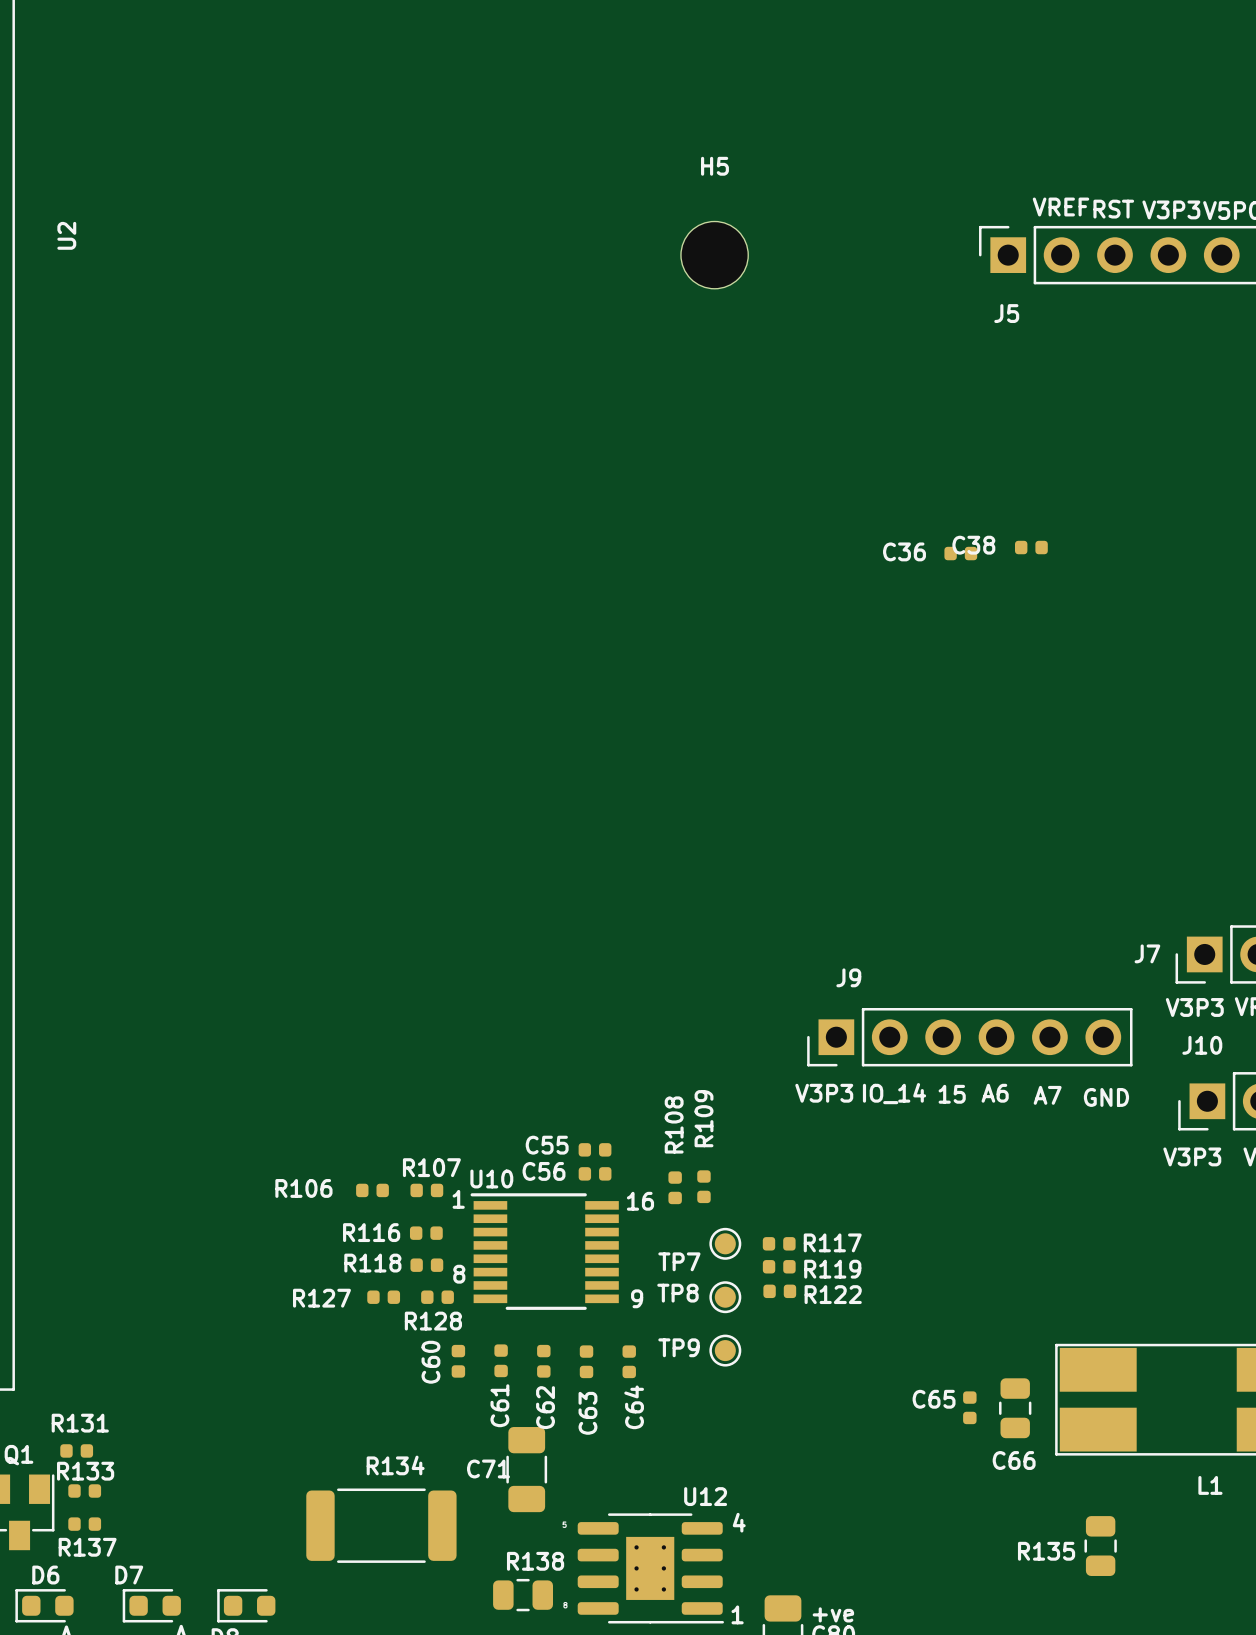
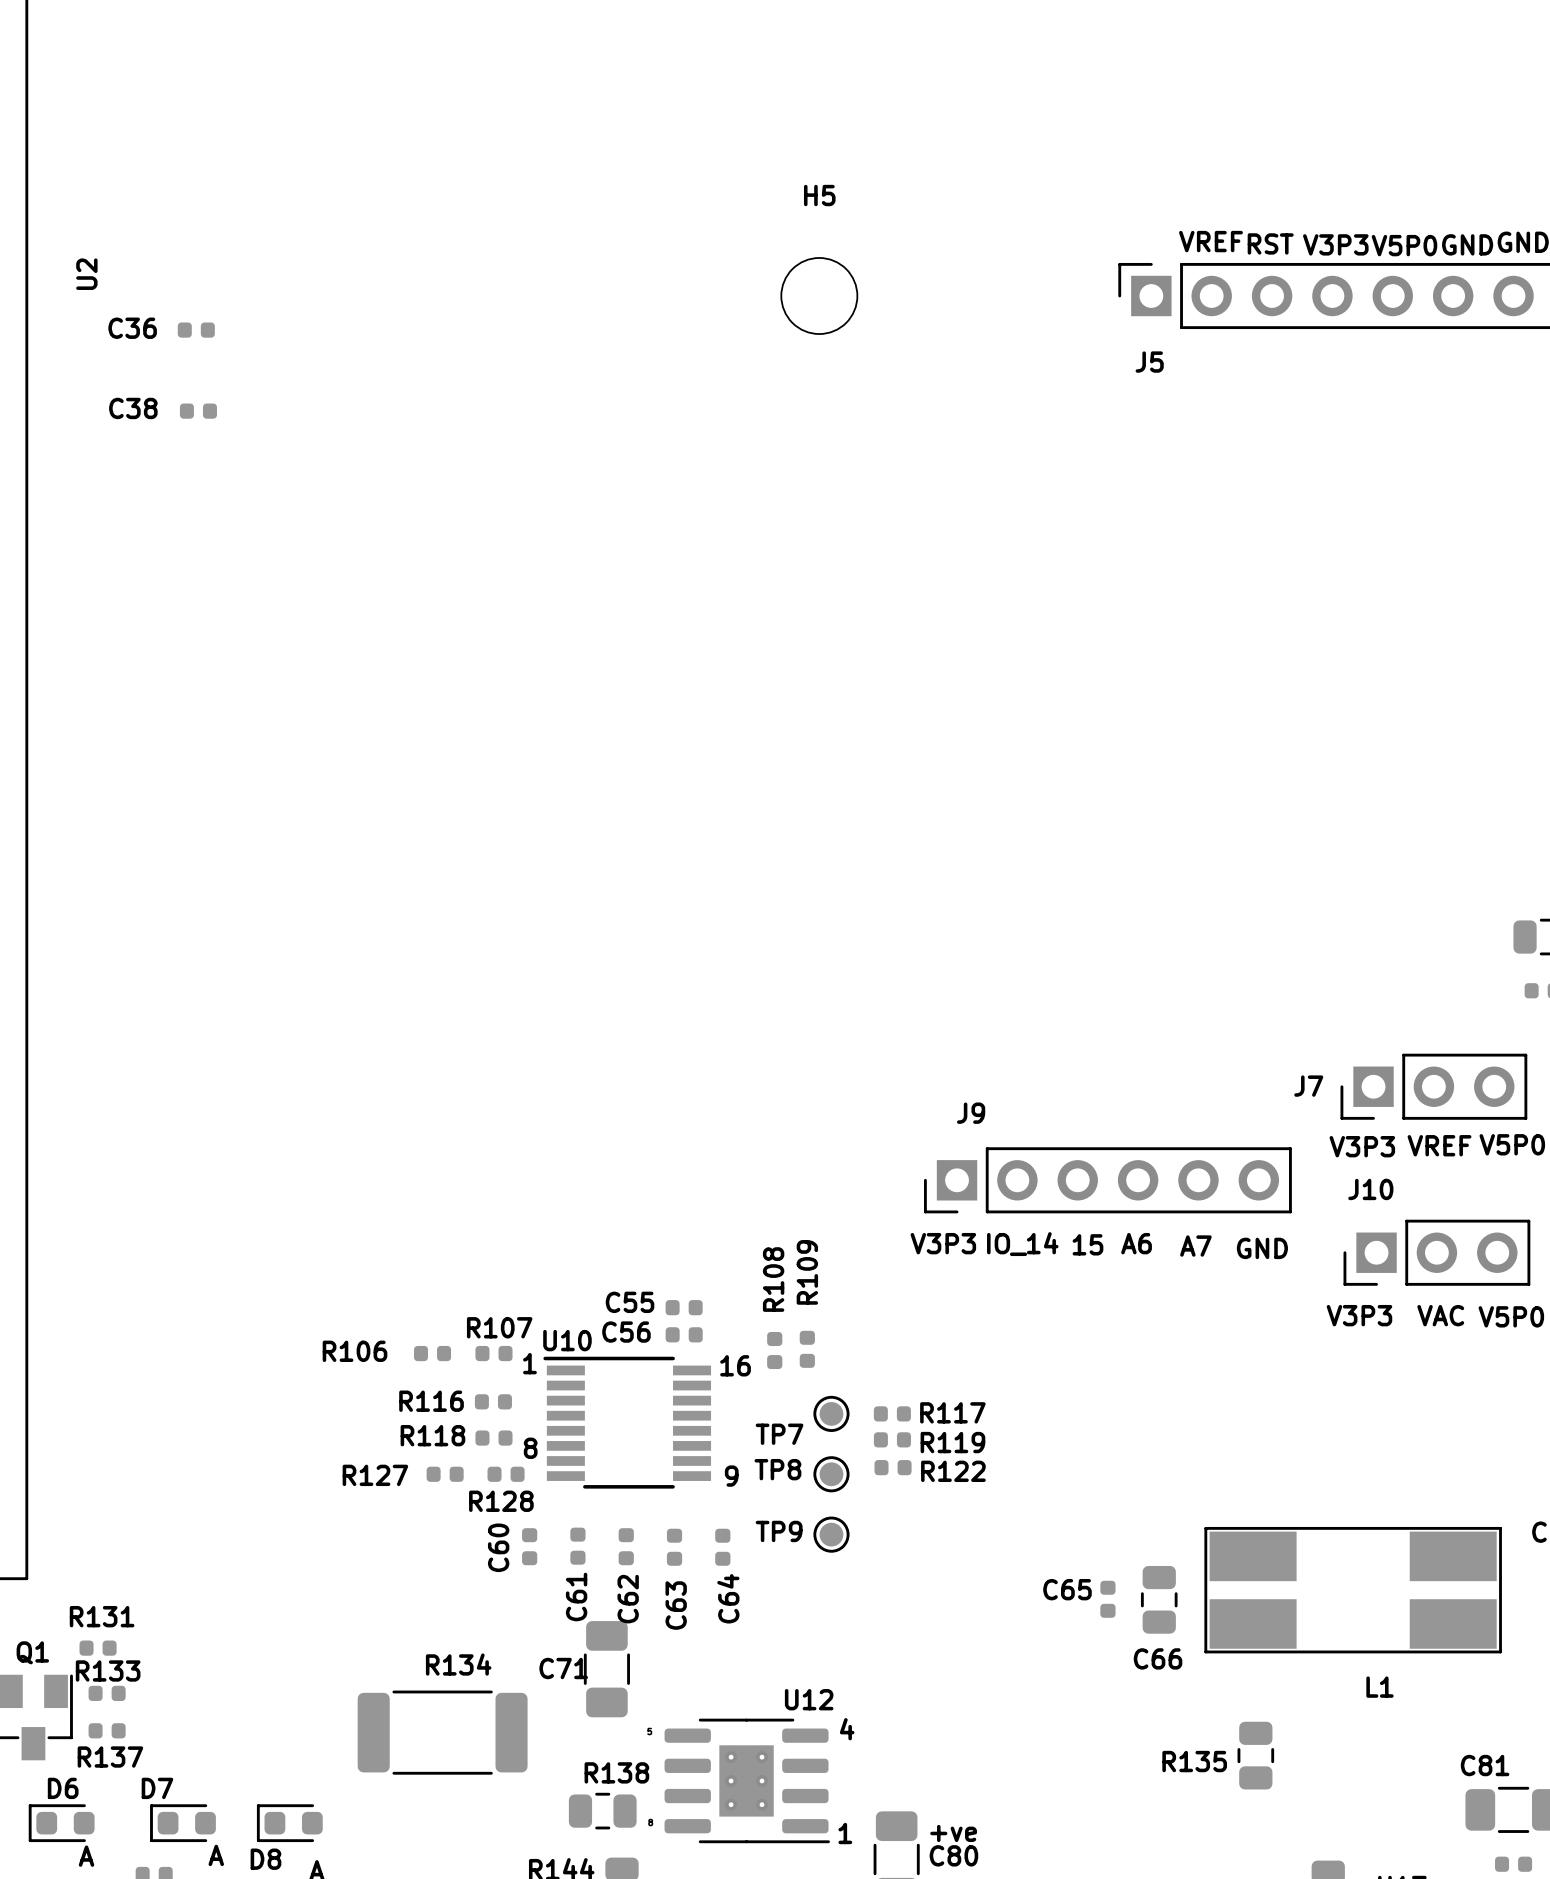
C38 position: (1031, 547) -> (198, 411)
C36 position: (960, 553) -> (196, 330)

